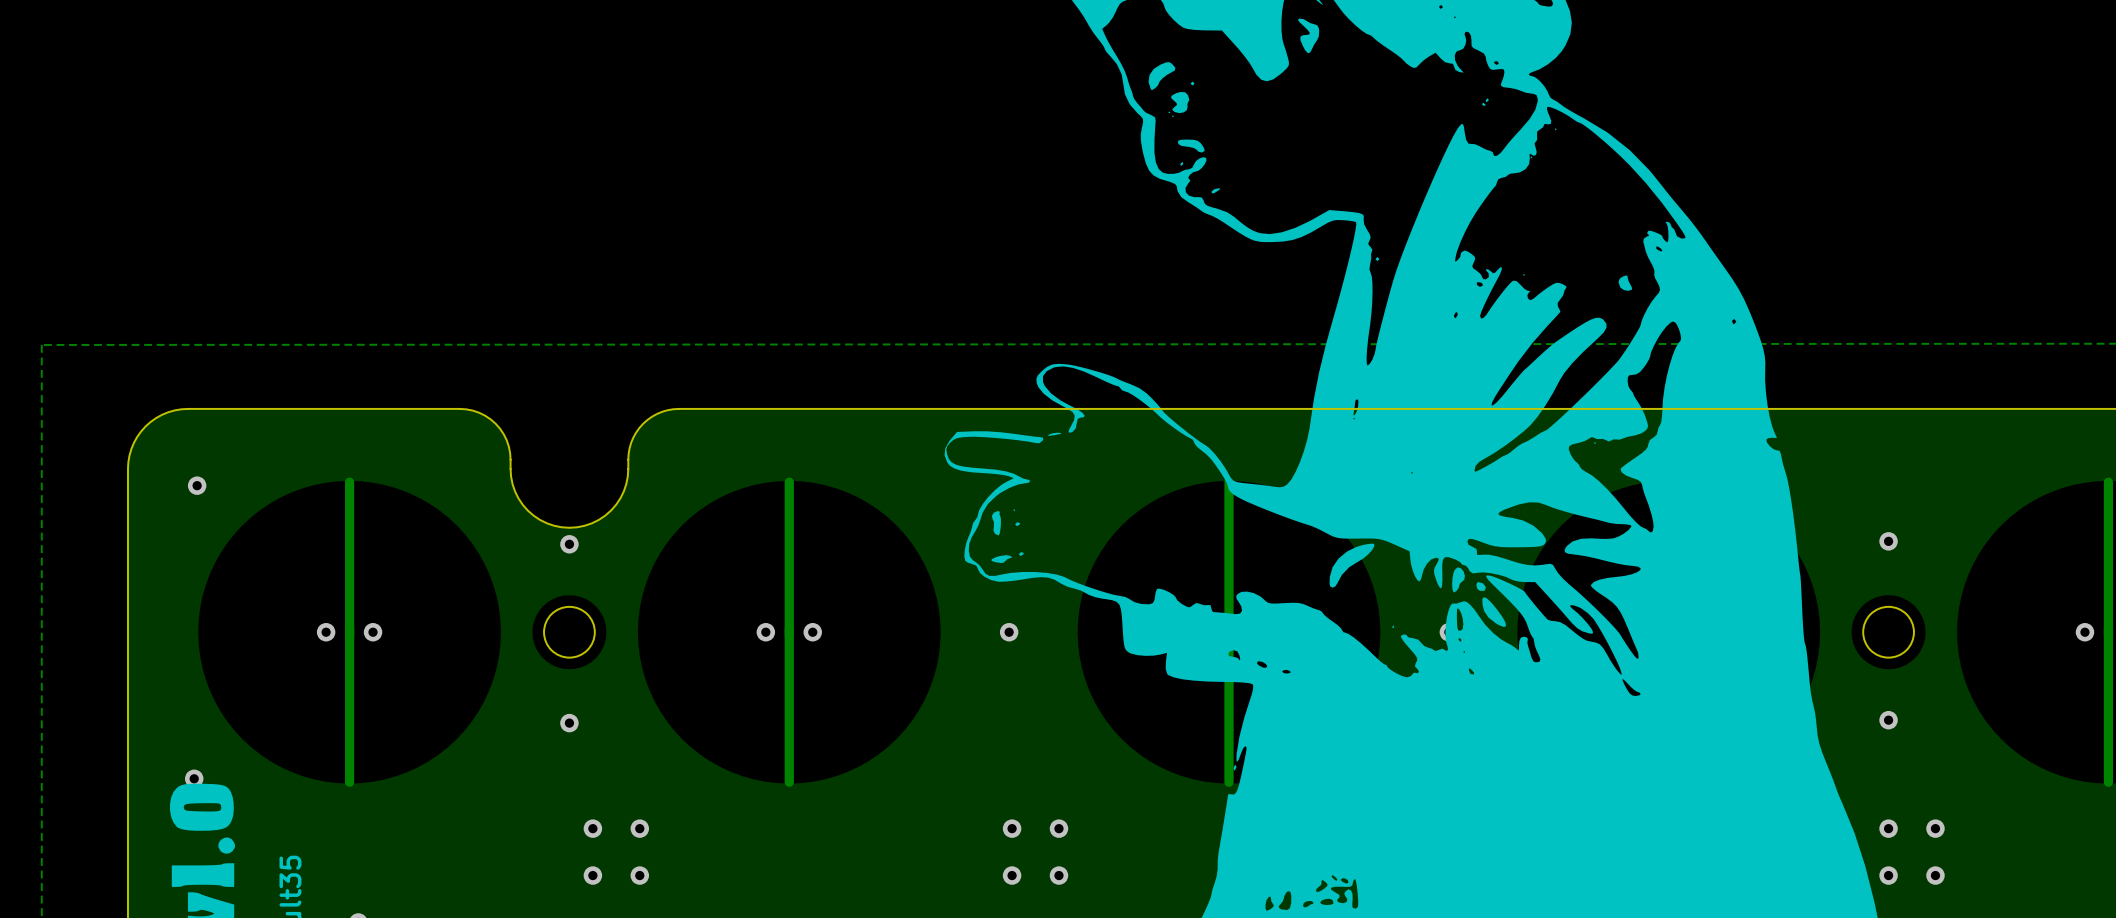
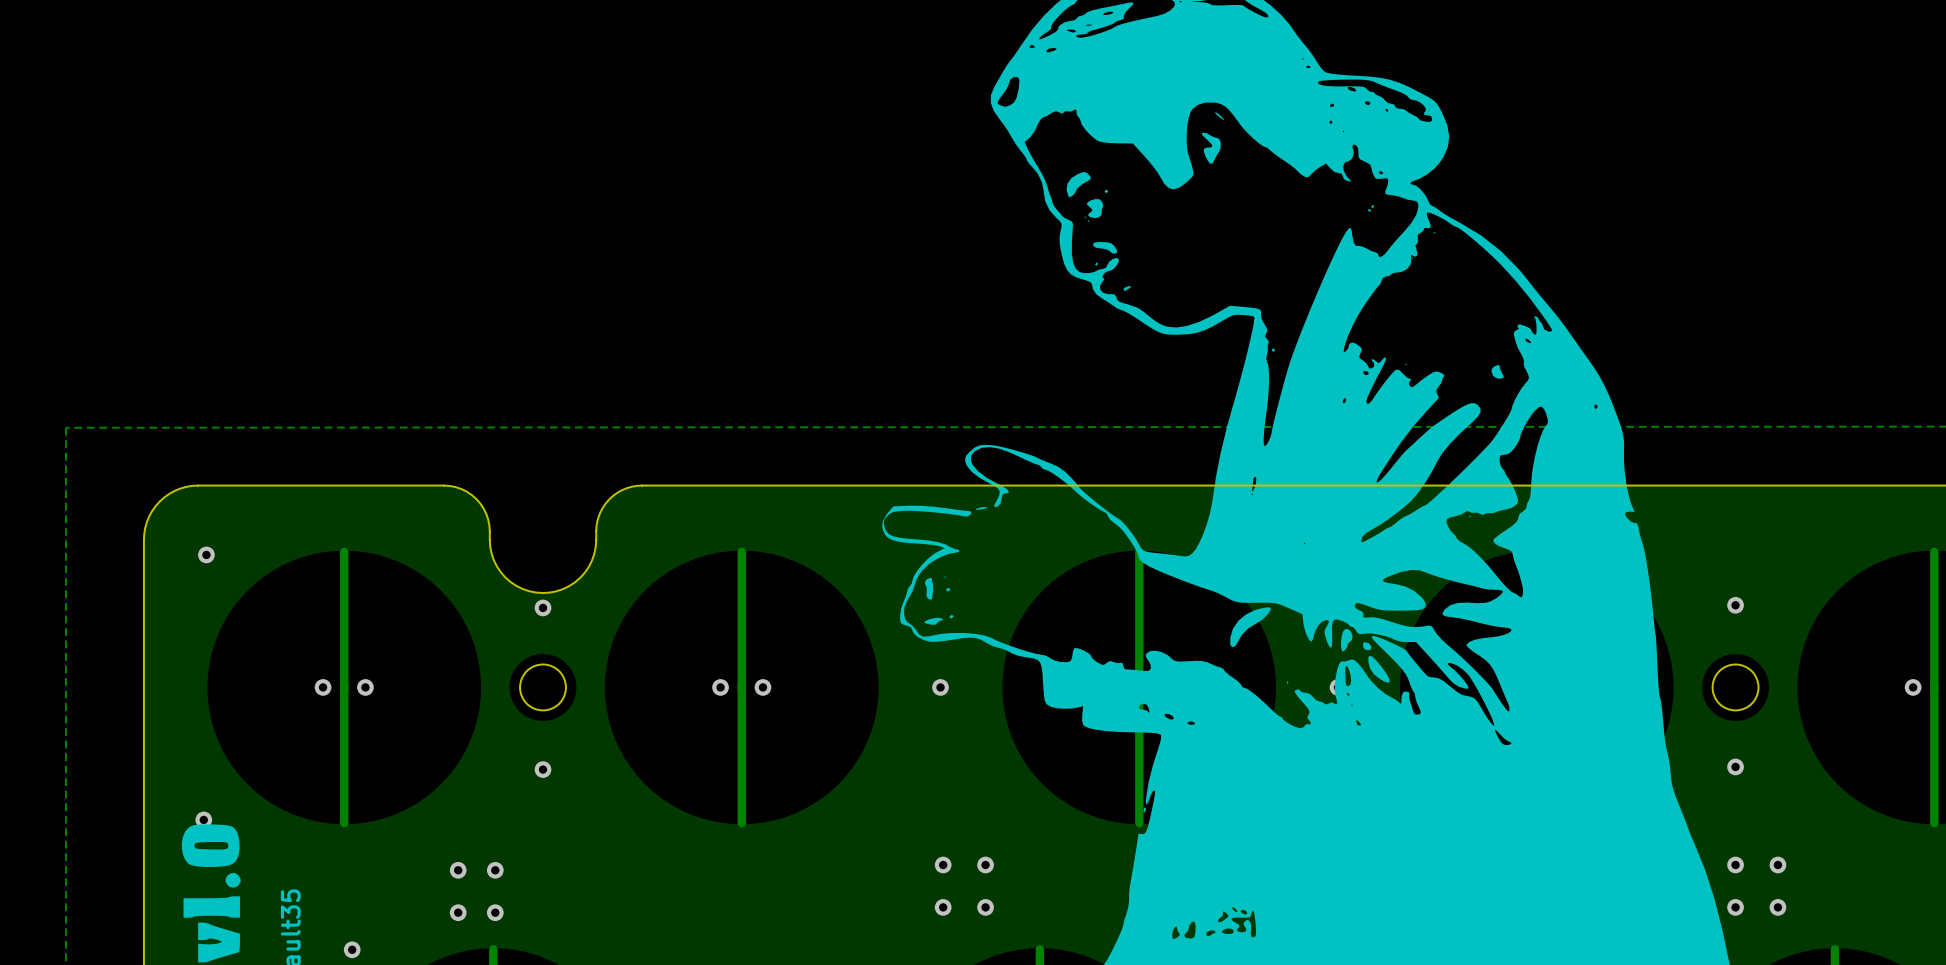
via: (592, 828) -> none
via: (639, 828) -> none
via: none -> (458, 870)
via: none -> (495, 870)
via: (592, 875) -> none
via: (639, 875) -> none
via: none -> (458, 912)
via: none -> (495, 912)

